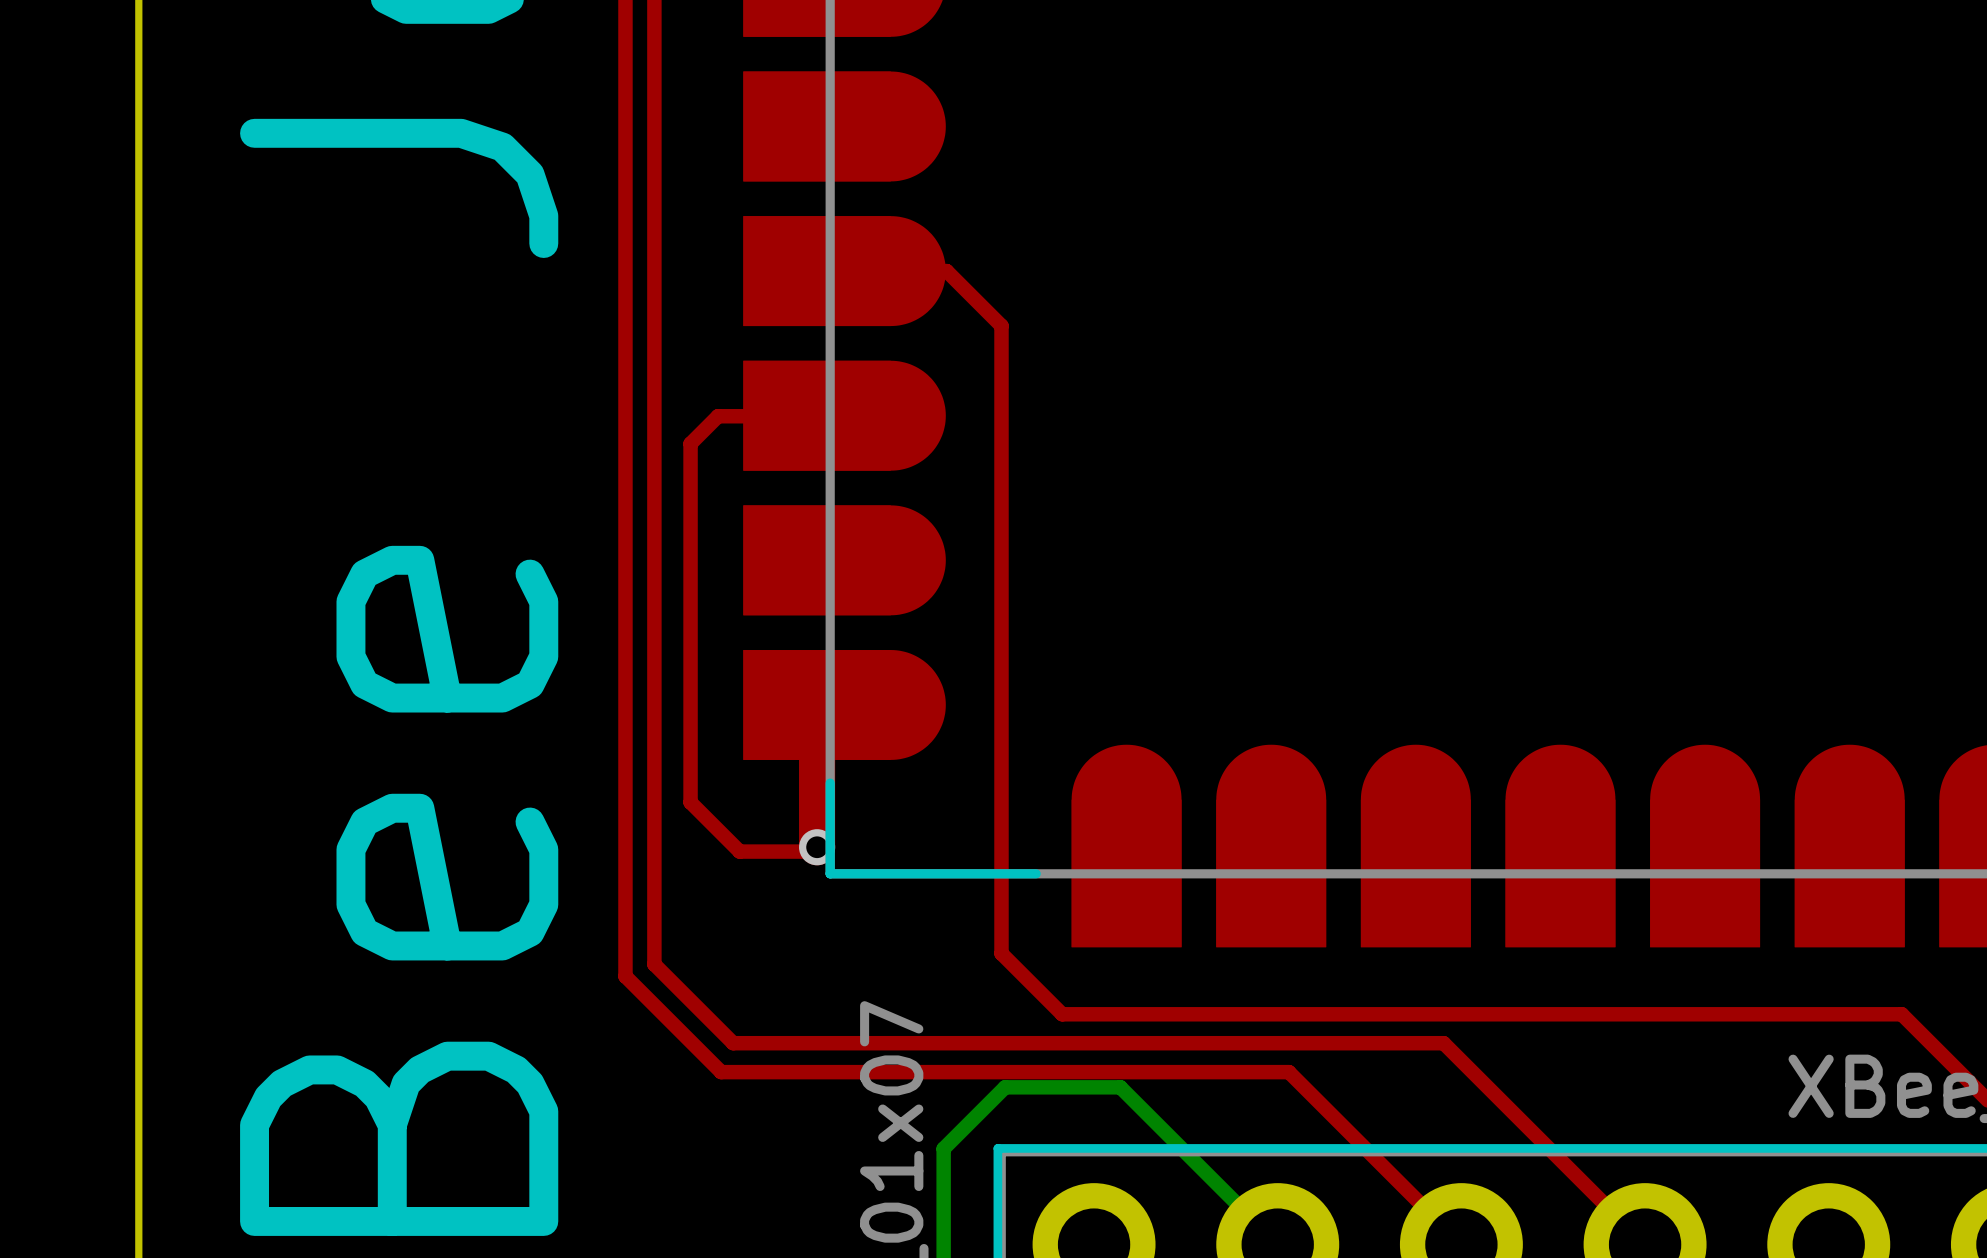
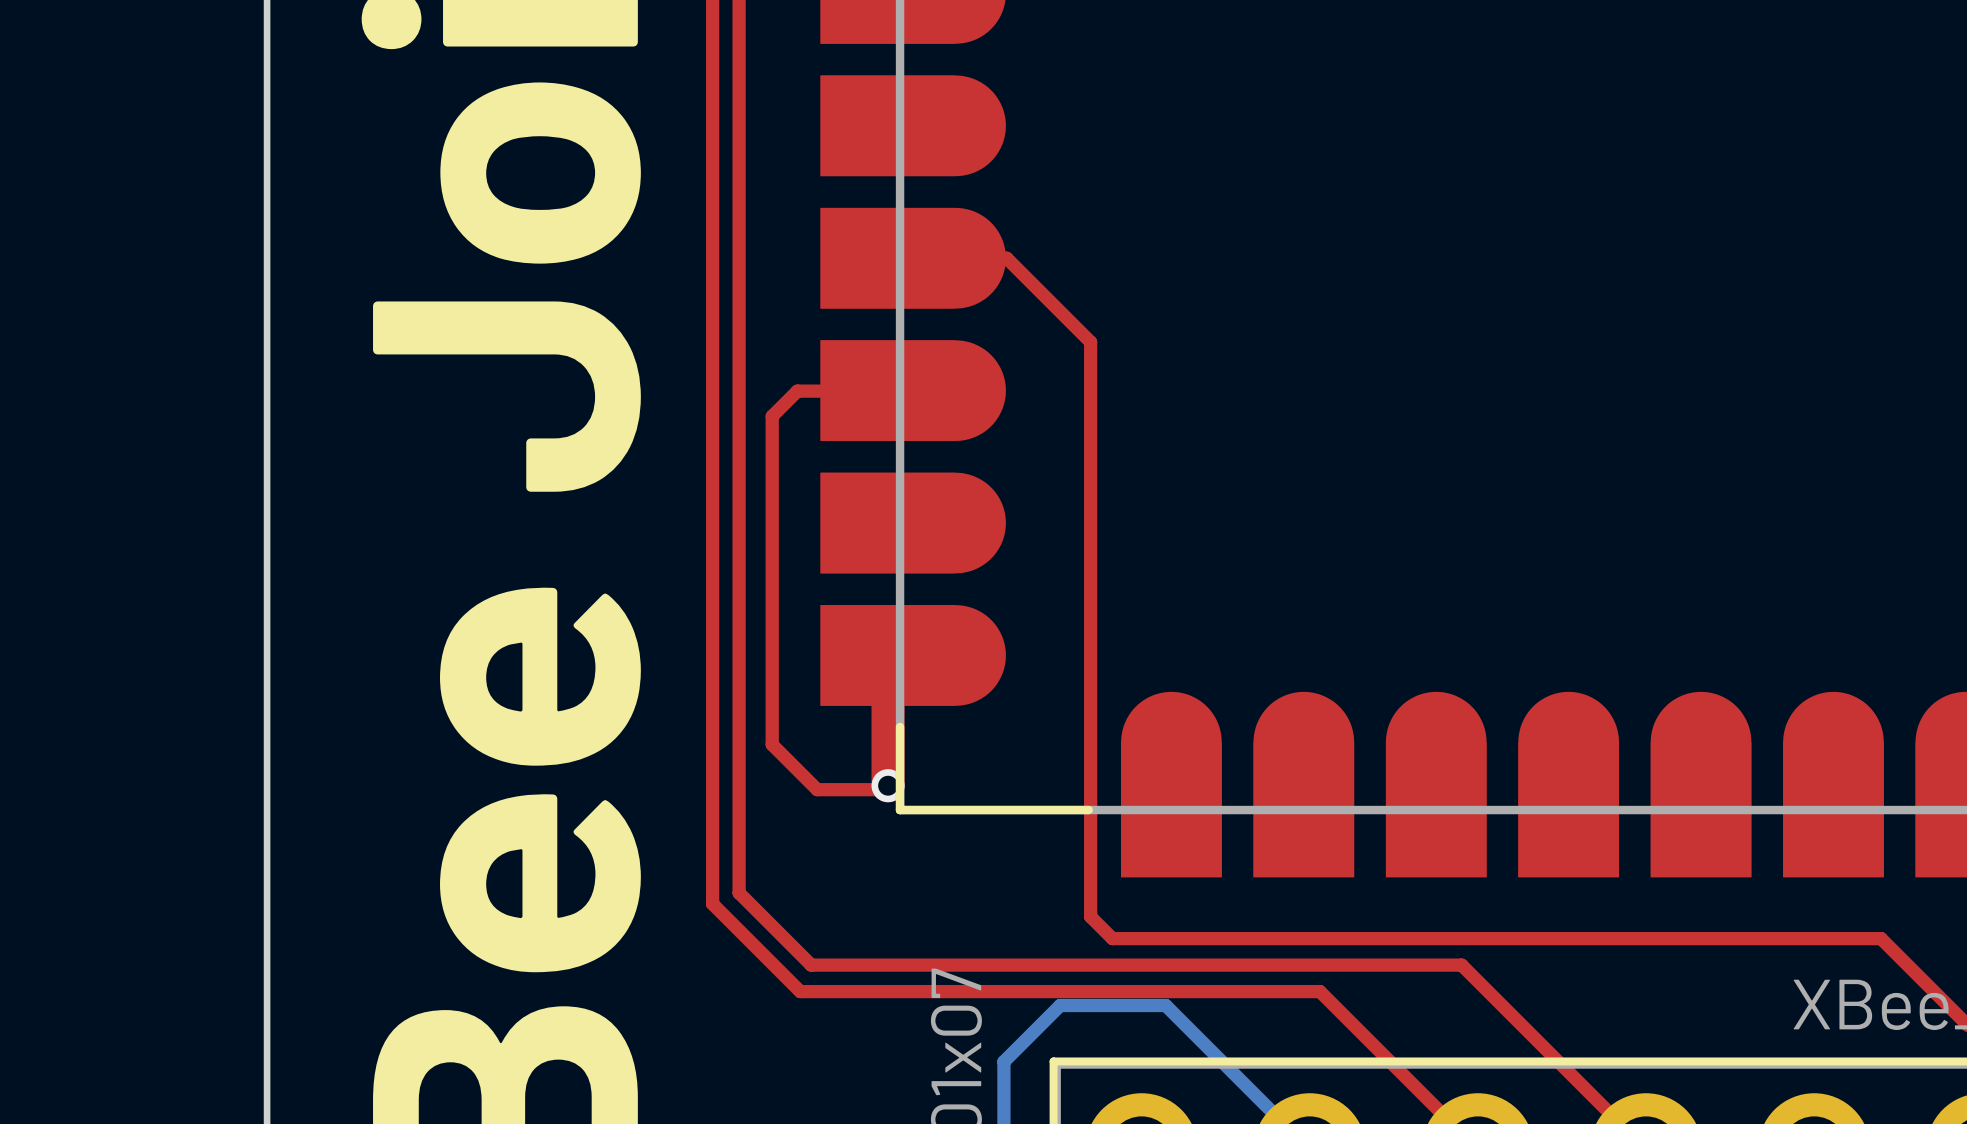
top track: (1001, 325) (1001, 953) (1038, 990) -> (1056, 308) (1090, 342) (1090, 916)

